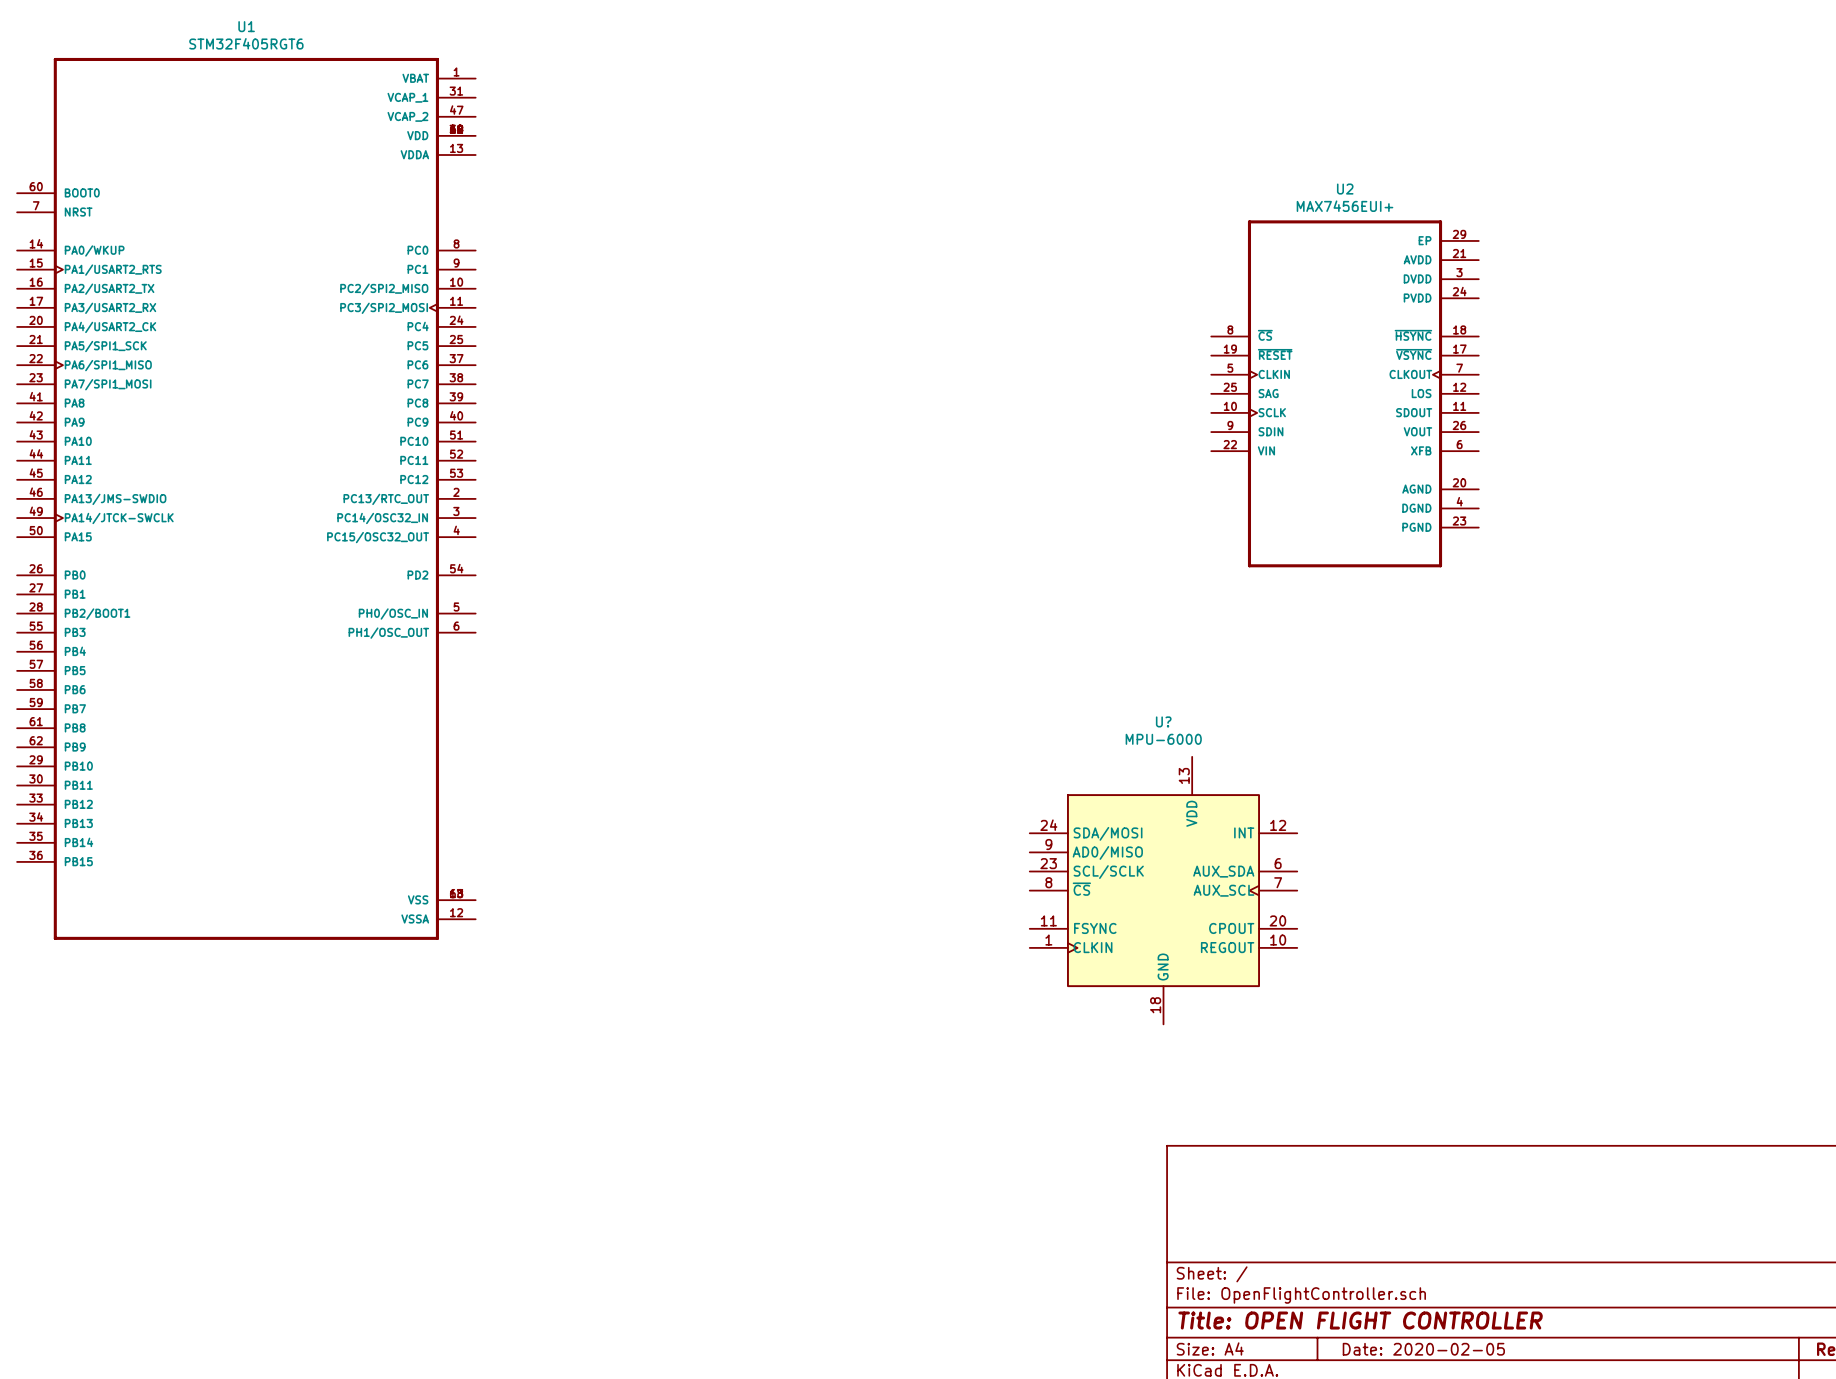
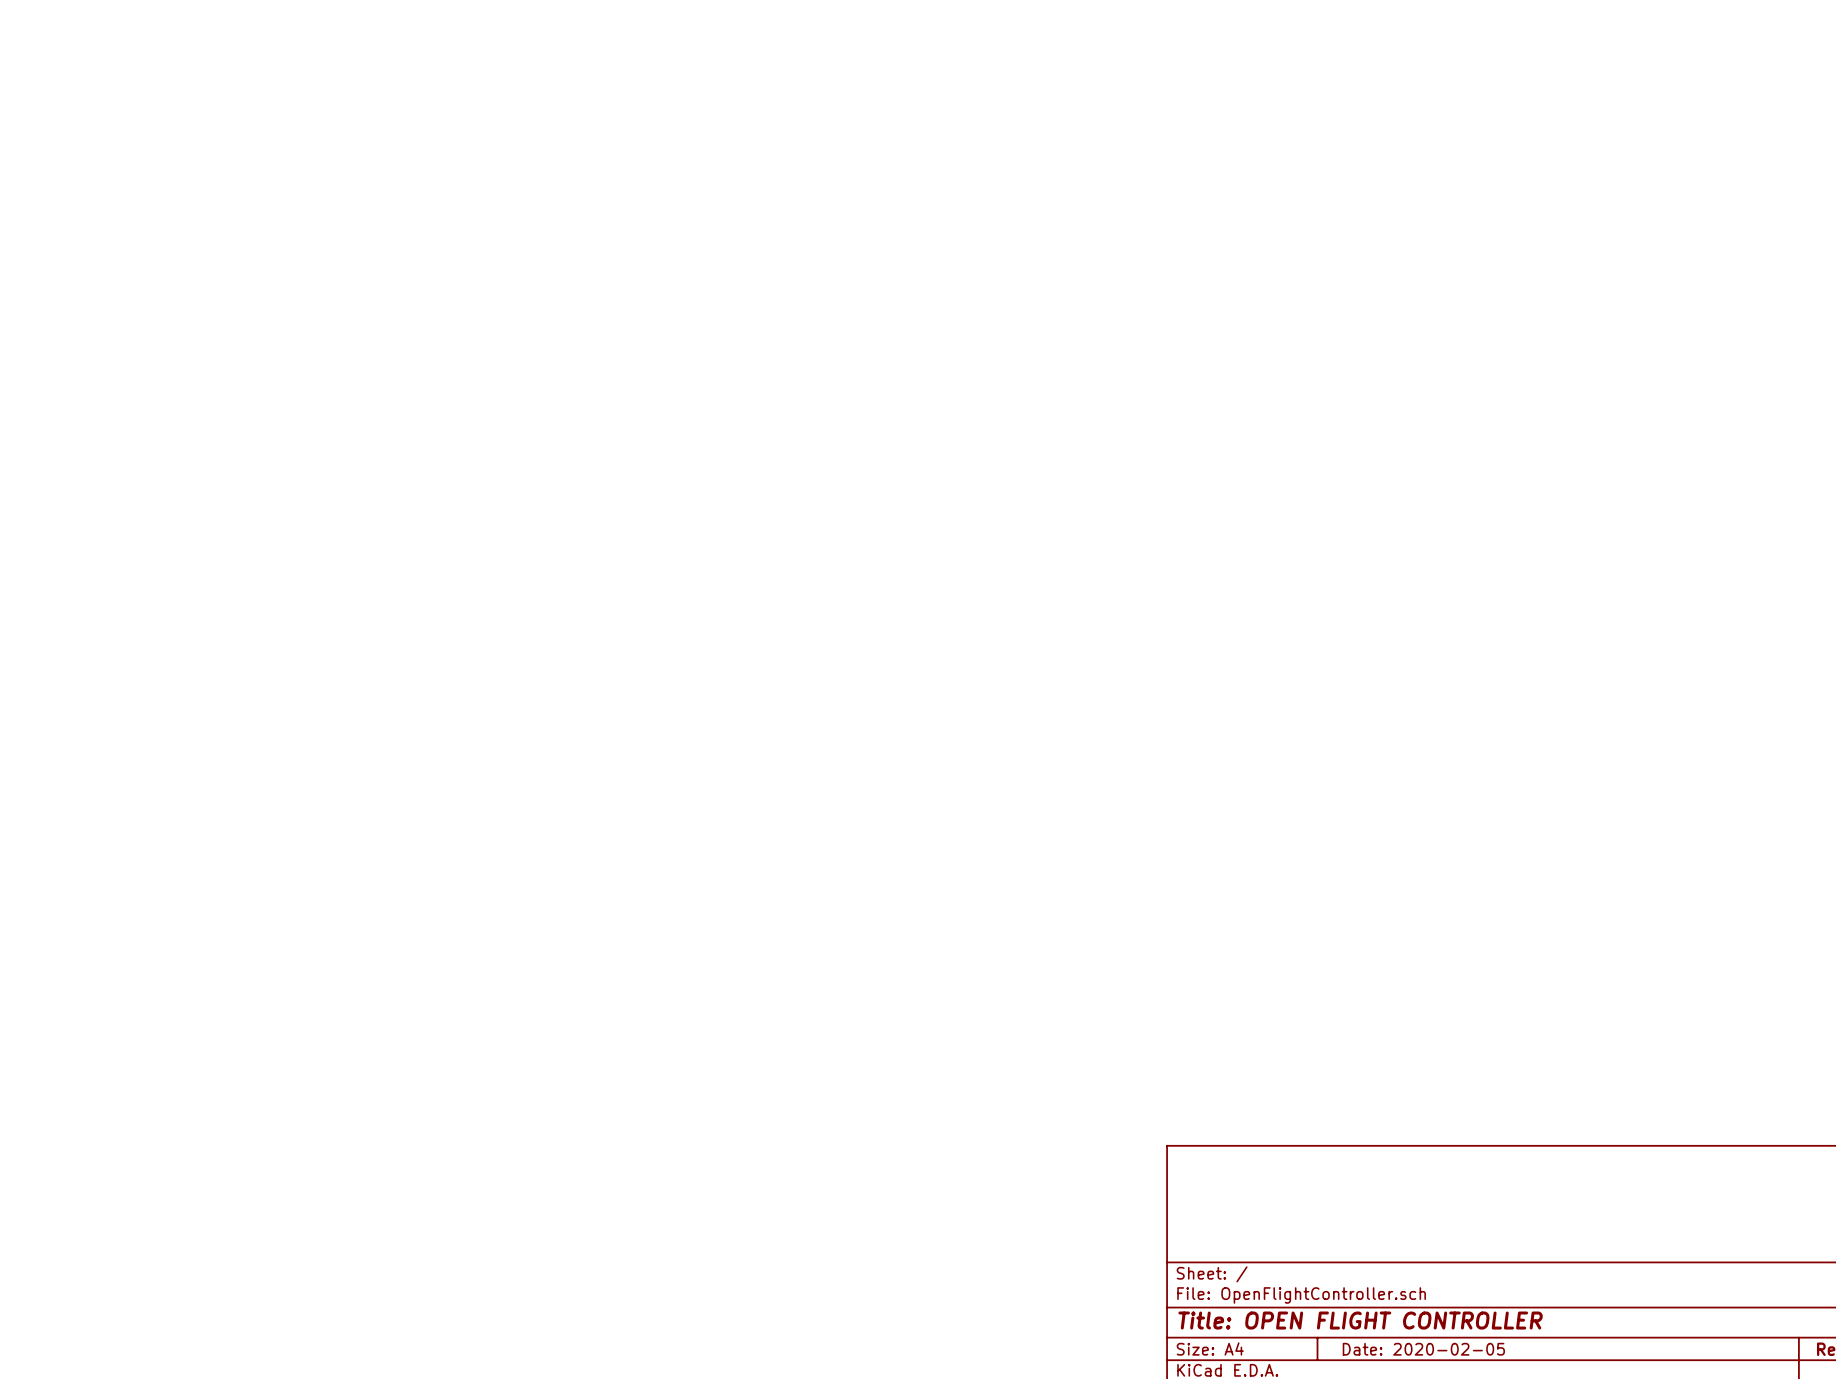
U2: MAX7456EUI+ (1345, 393) -> none
U1: STM32F405RGT6 (246, 498) -> none
U?: MPU-6000 (1163, 890) -> none

